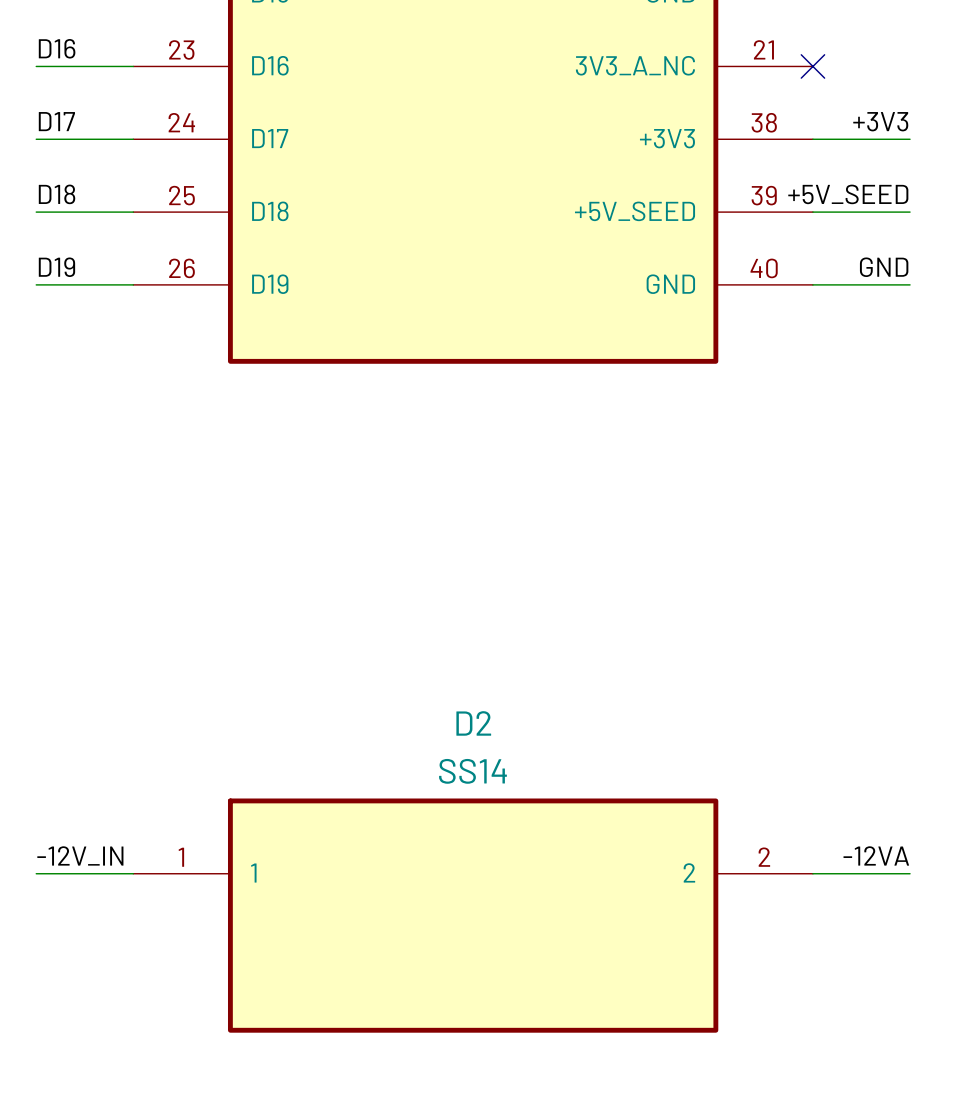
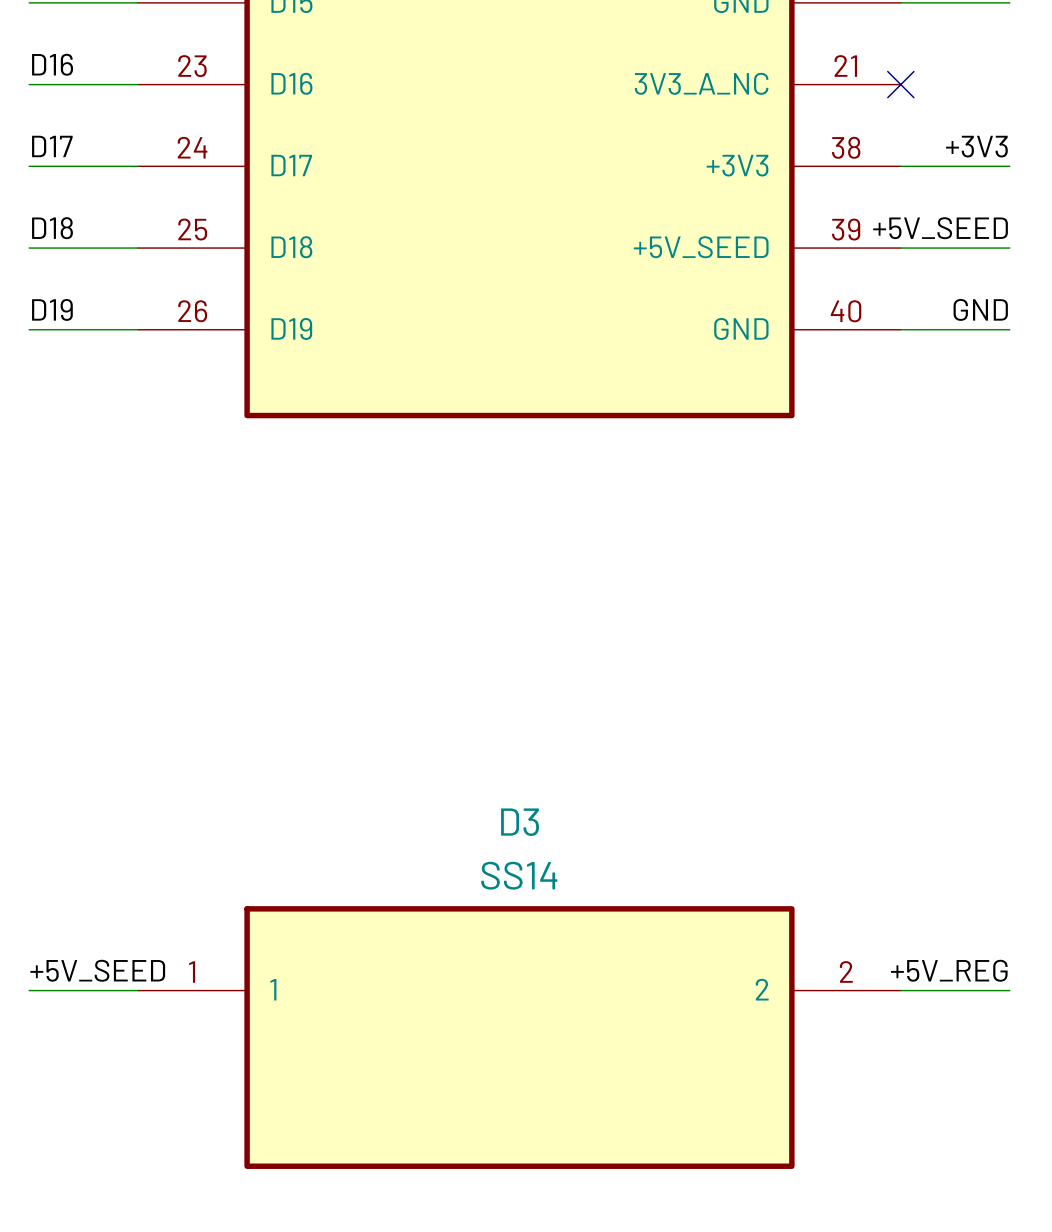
D2 name: D2 (473, 723) -> D3 (520, 822)
label: -12V_IN (80, 855) -> +5V_SEED (97, 970)
label: -12VA (876, 855) -> +5V_REG (949, 970)

